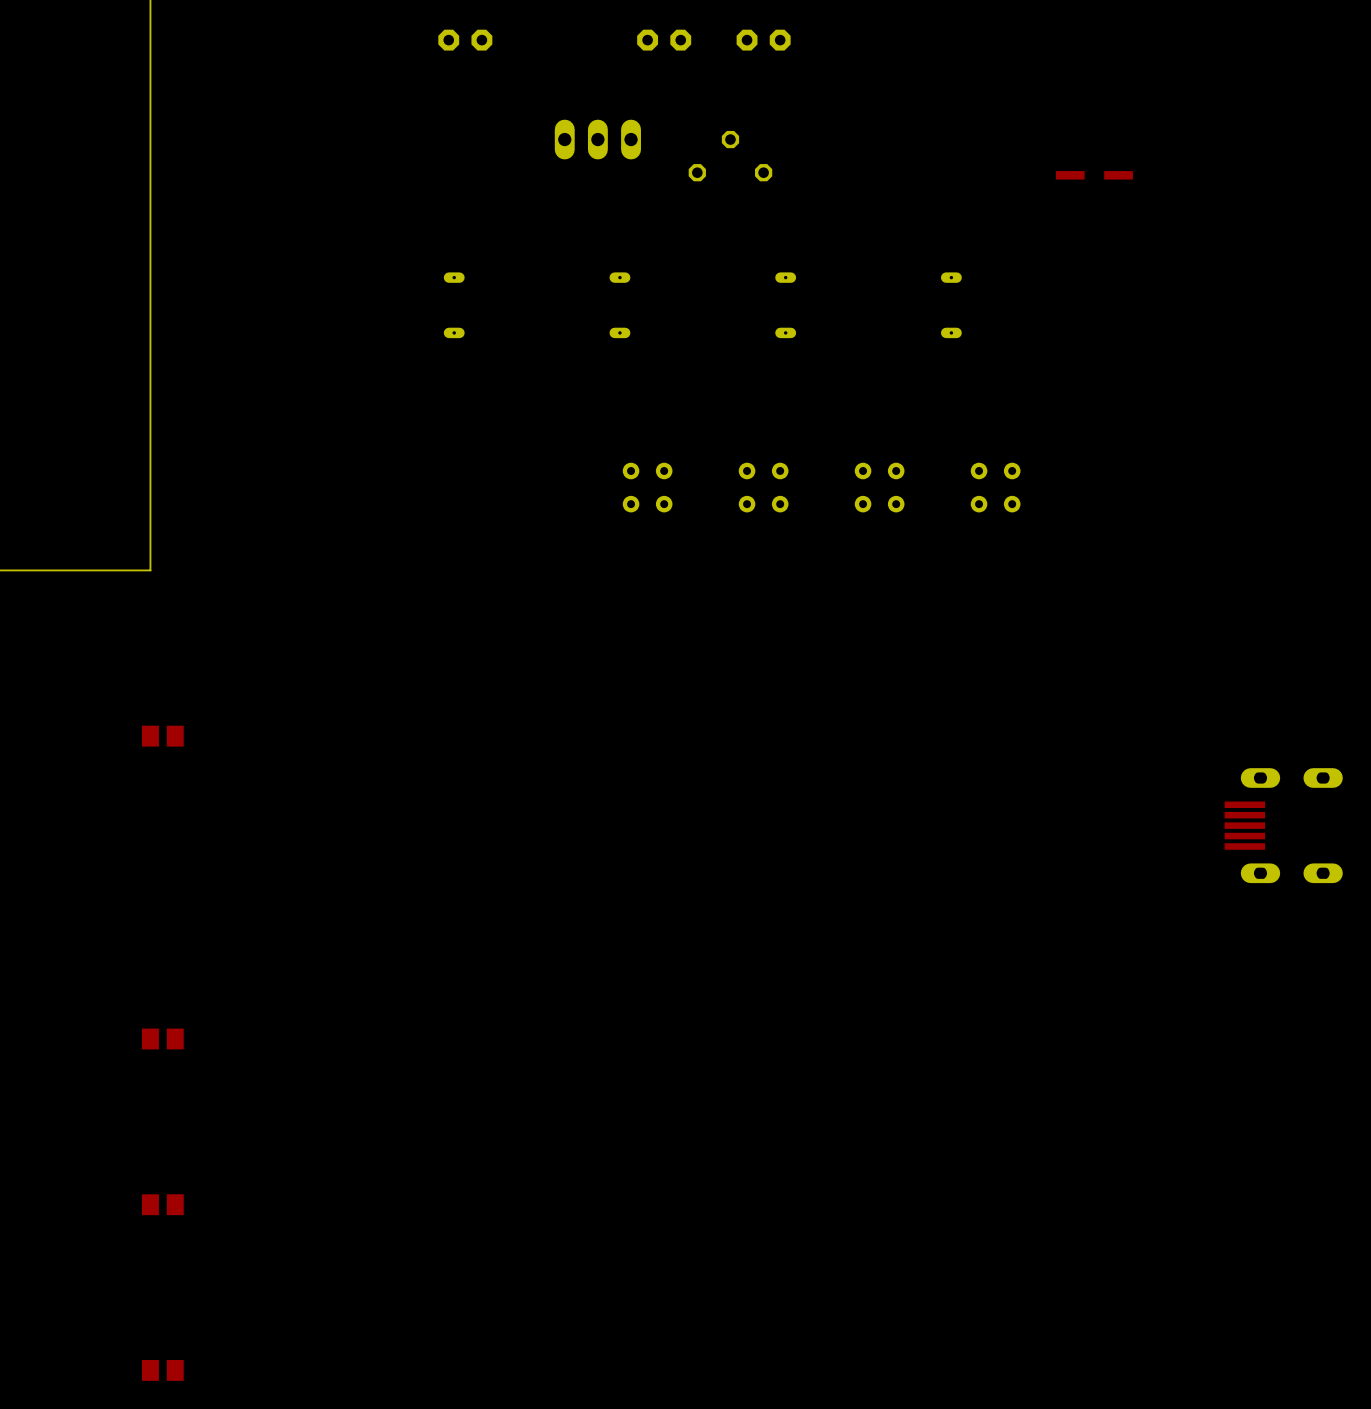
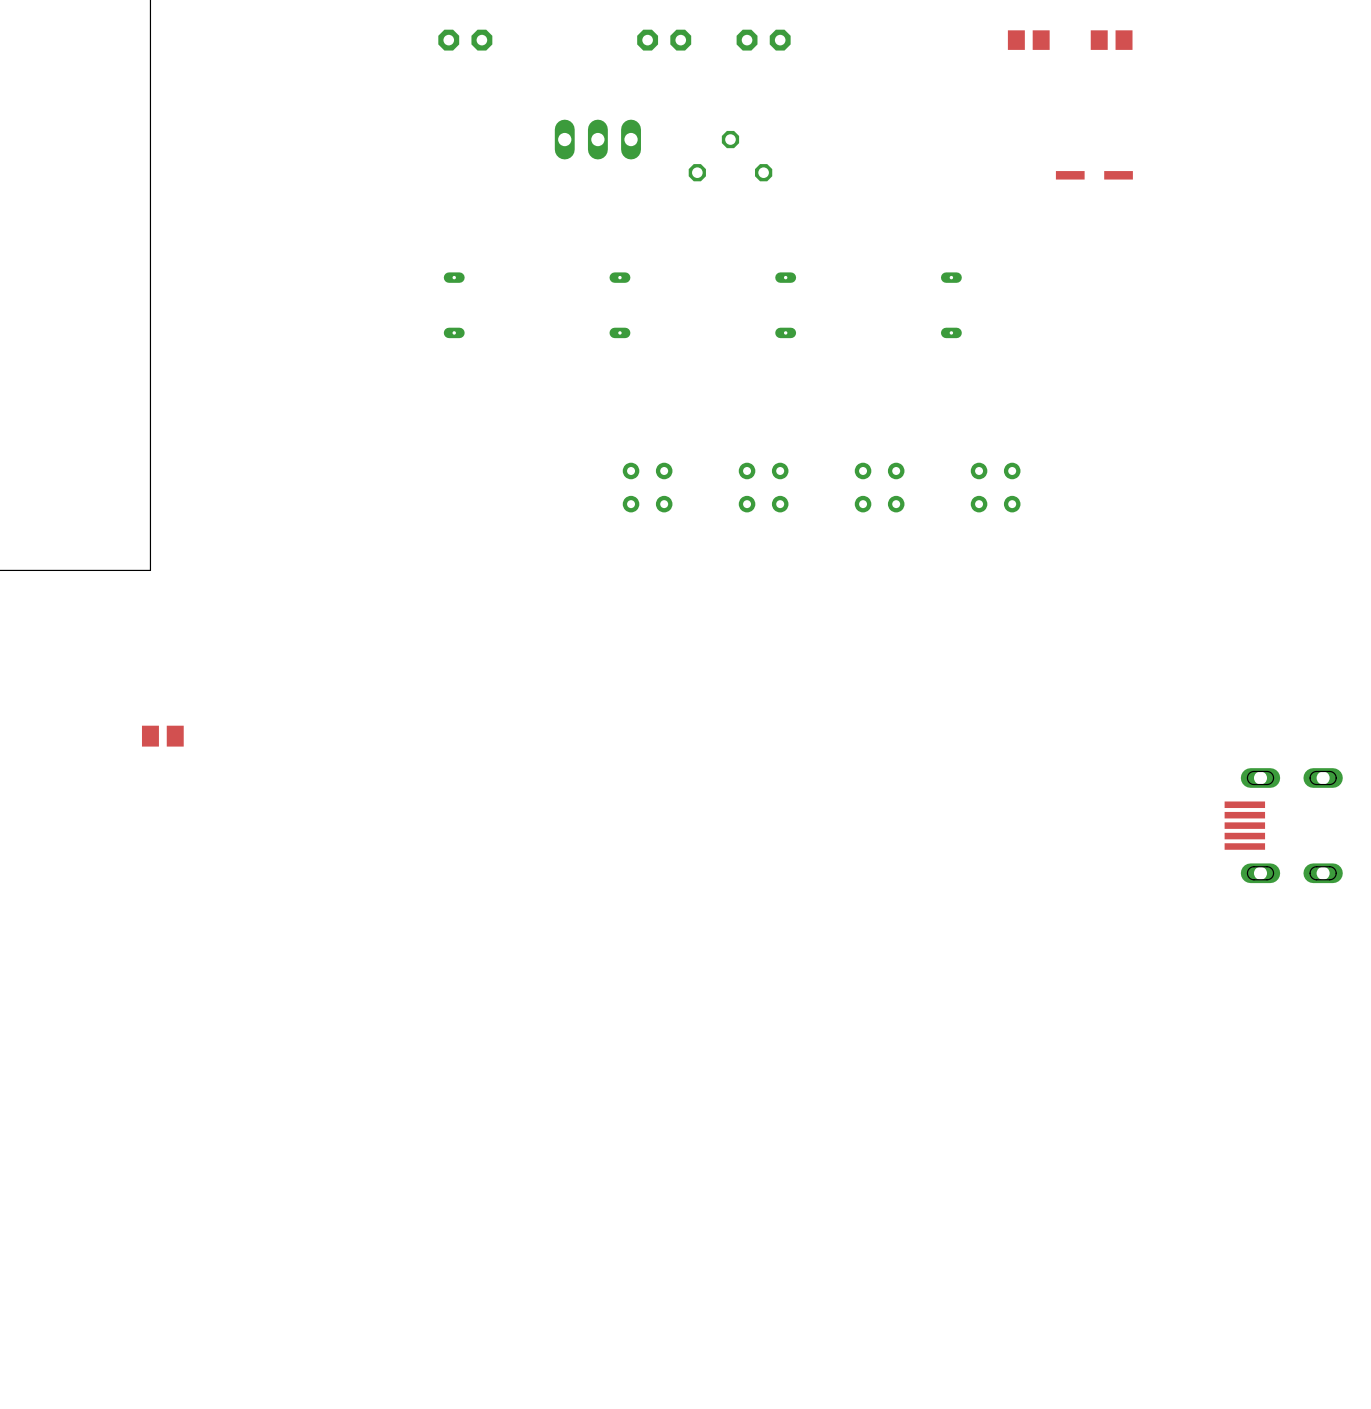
part: none -> (1028, 40)
part: none -> (1111, 40)
part: (162, 1038) -> none
part: (162, 1204) -> none
part: (162, 1370) -> none

